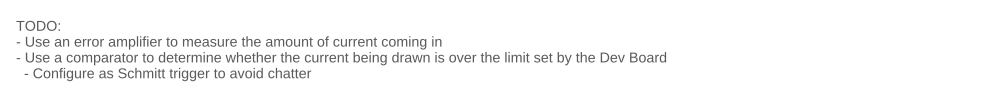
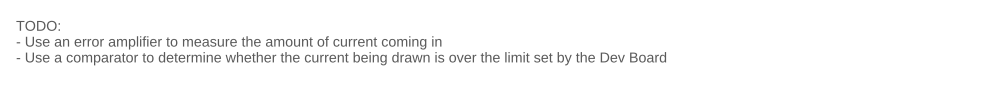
text: - Configure as Schmitt trigger to avoid chatter (167, 74) -> none

